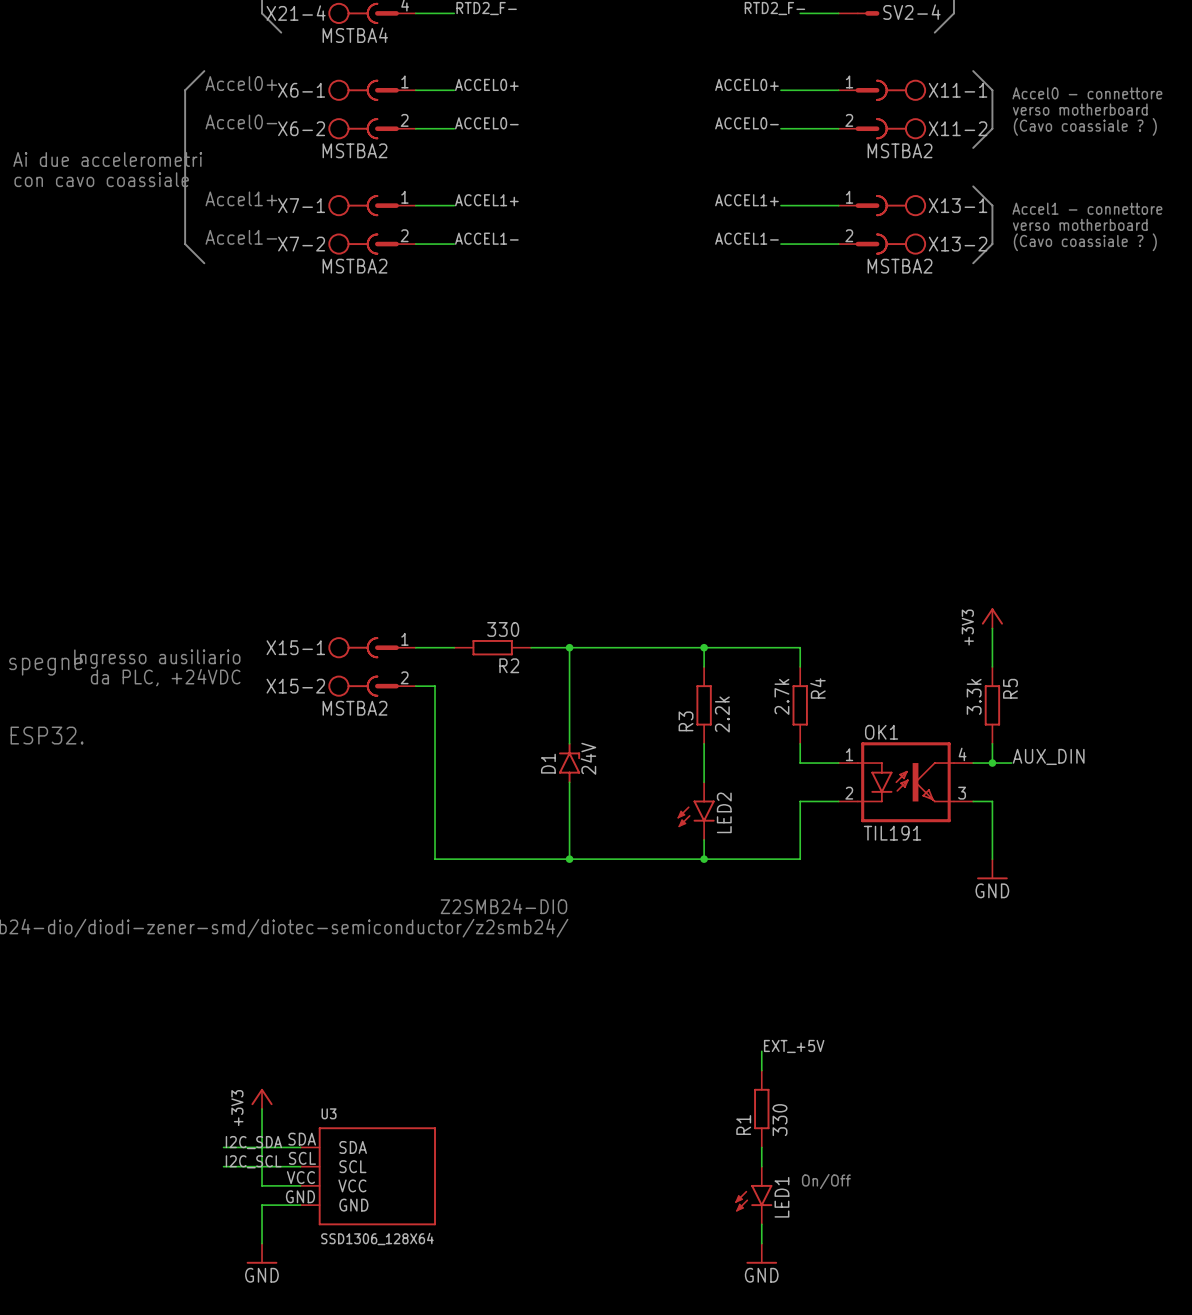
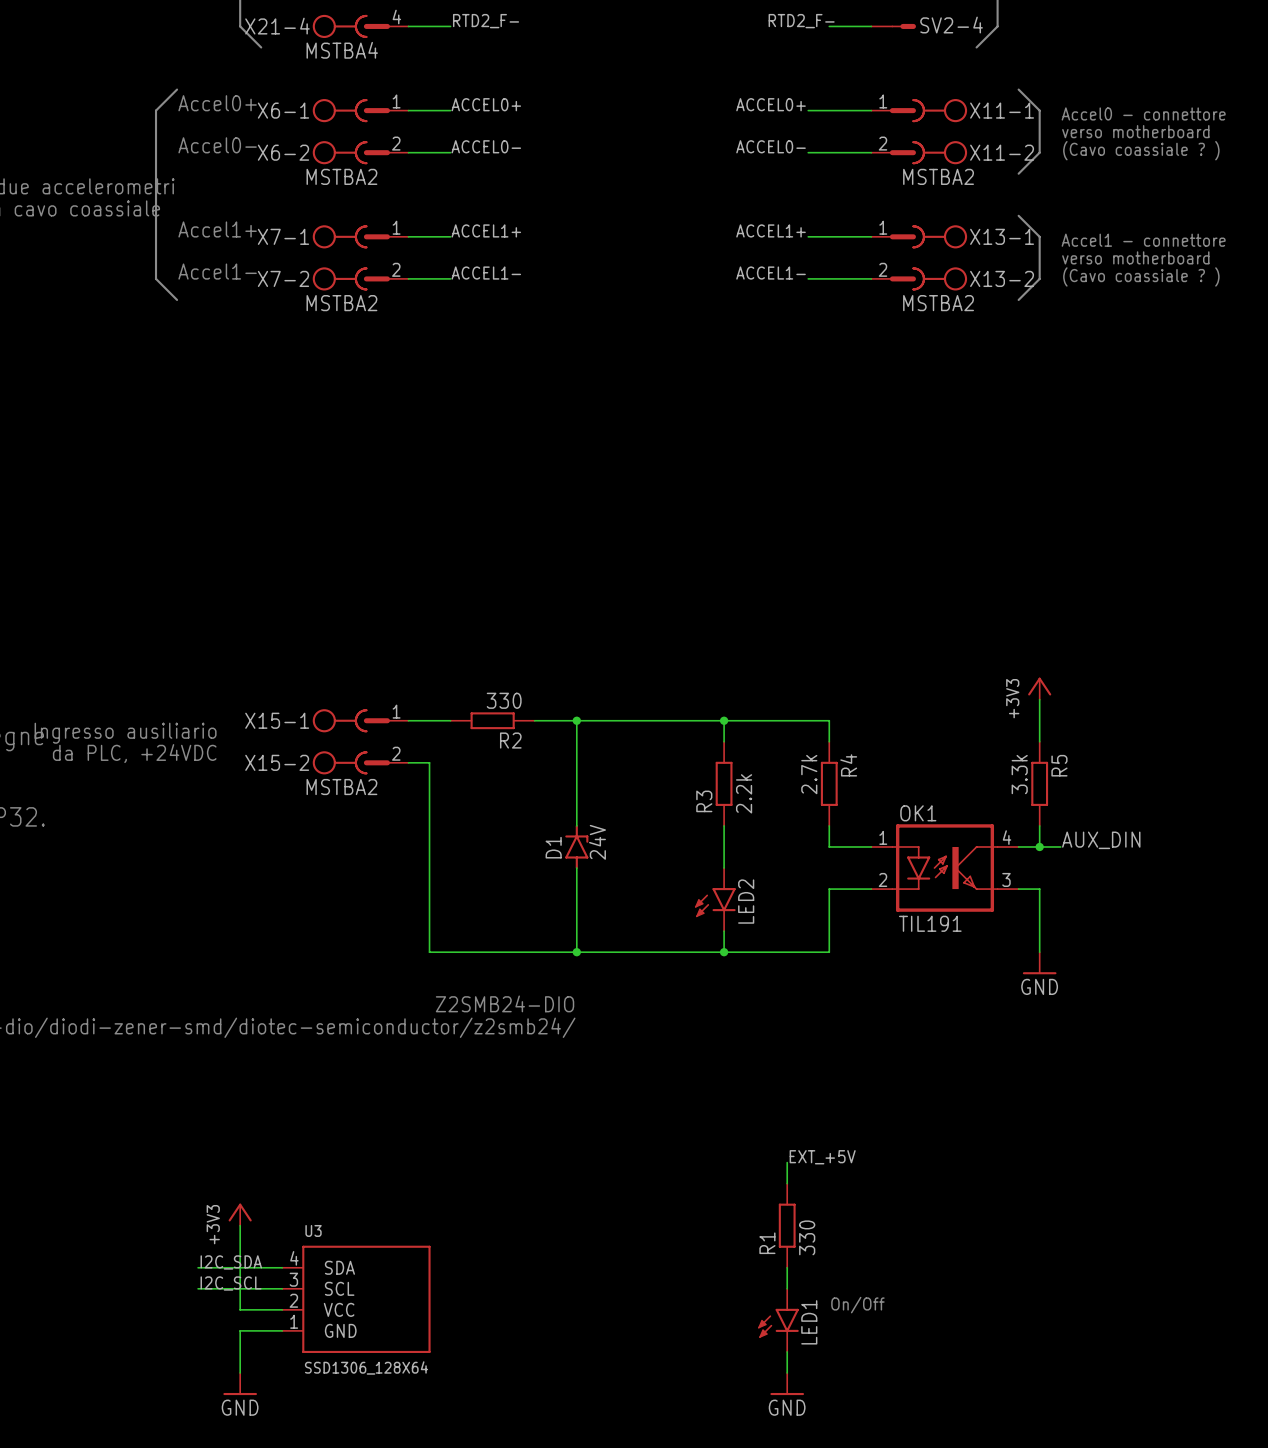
U3 pin number: SDA (302, 1139) -> 4 (294, 1258)
U3 pin number: SCL (302, 1158) -> 3 (293, 1279)
U3 pin number: VCC (300, 1177) -> 2 (293, 1300)
U3 pin number: GND (300, 1196) -> 1 (294, 1321)

